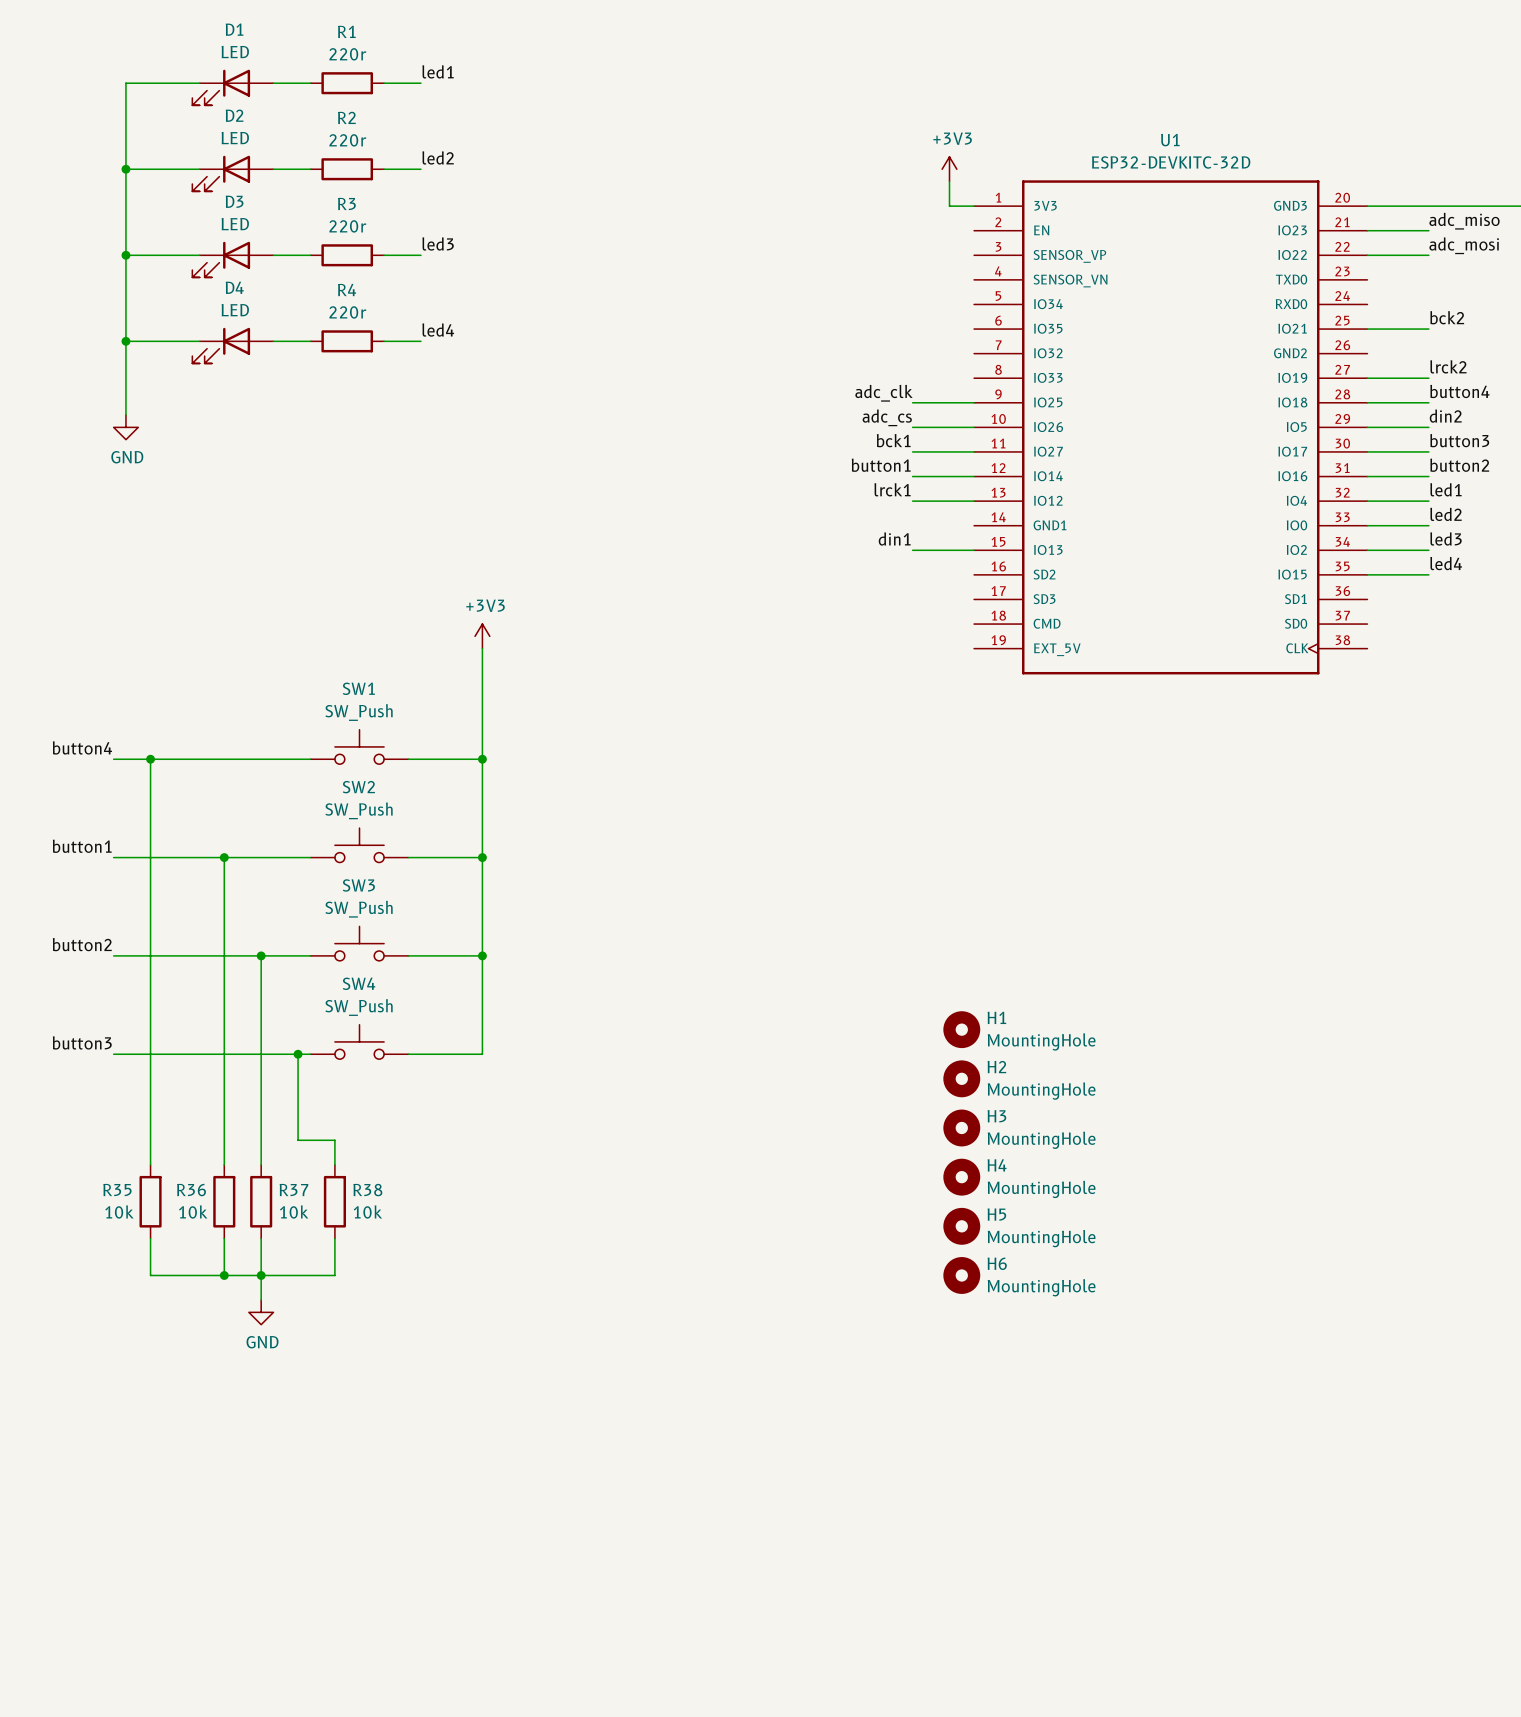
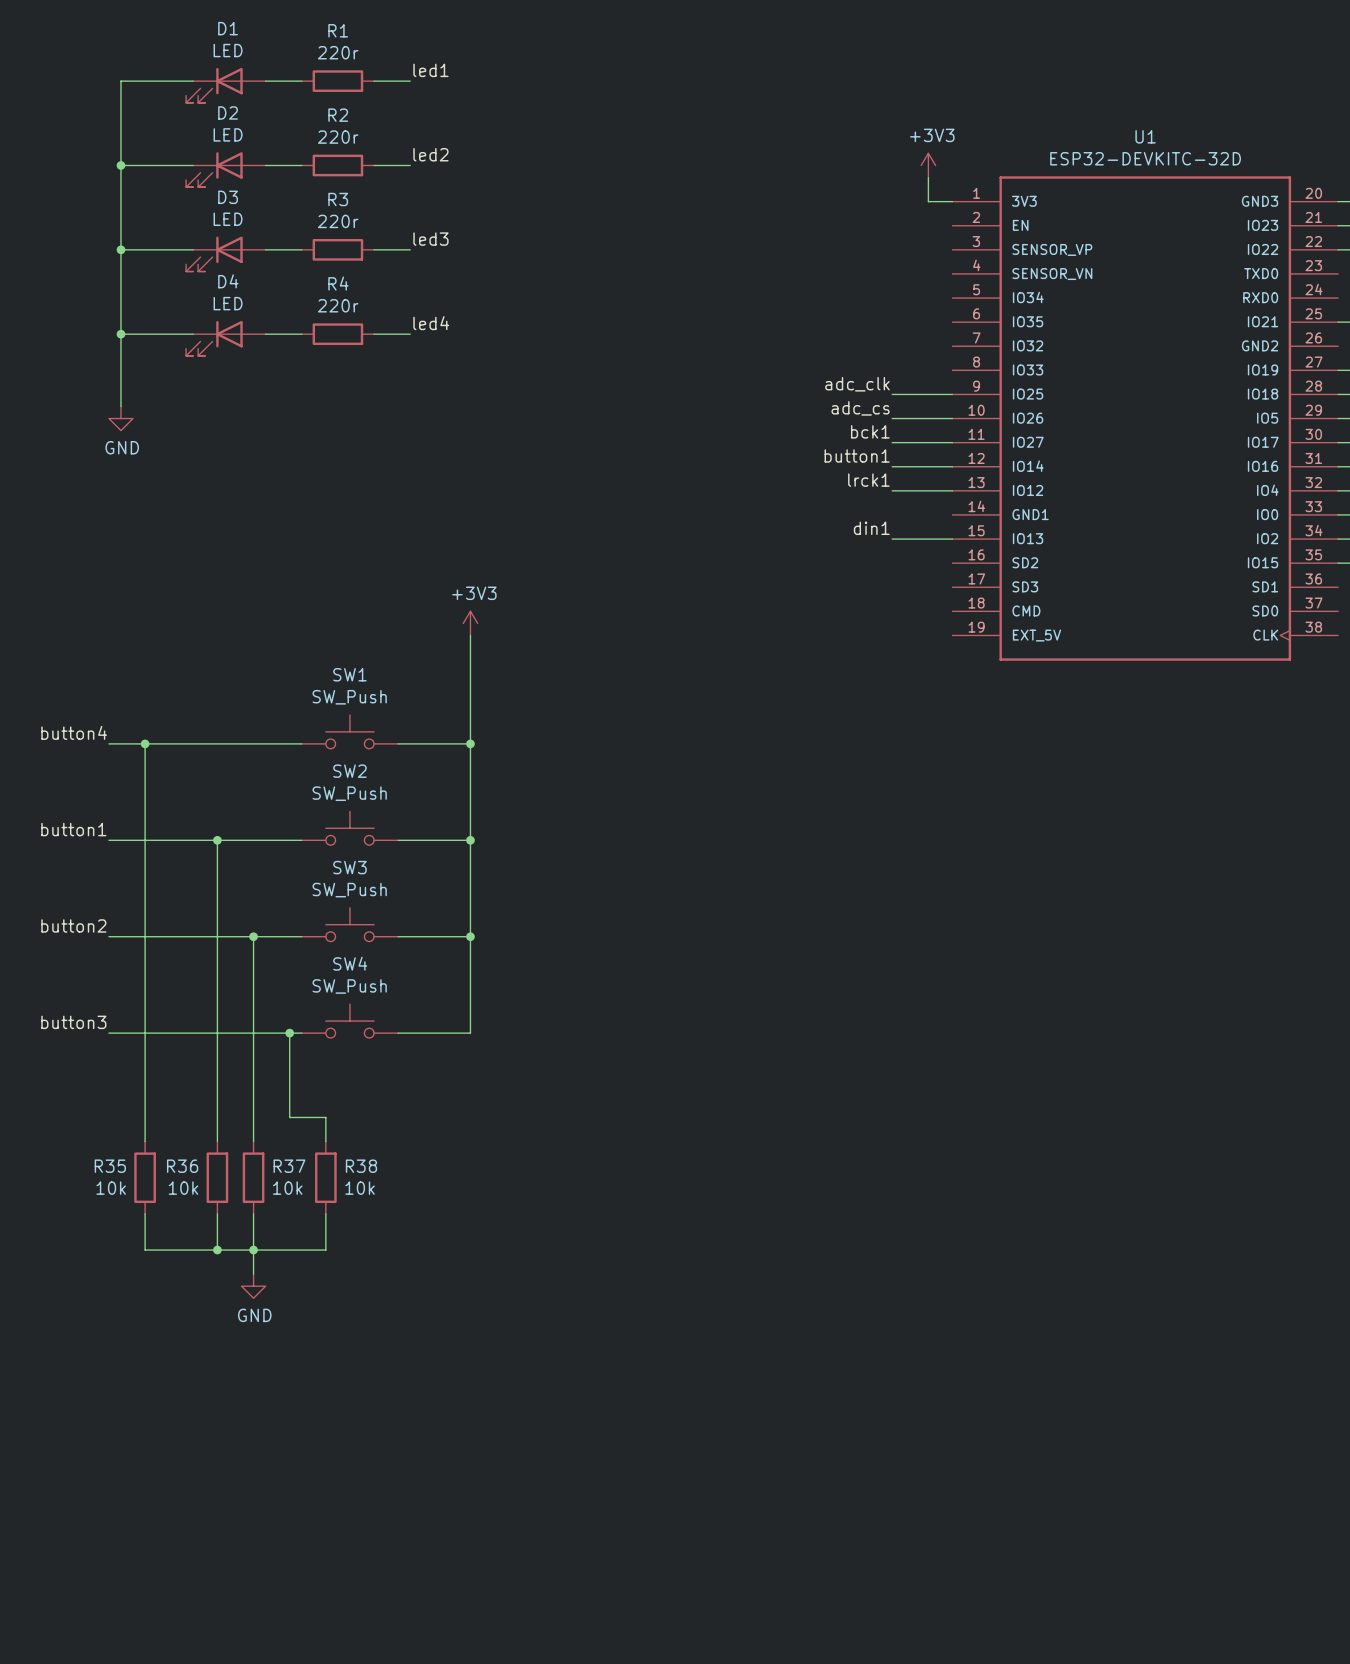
H1: MountingHole (961, 1029) -> none
H2: MountingHole (961, 1078) -> none
H3: MountingHole (961, 1127) -> none
H4: MountingHole (961, 1177) -> none
H5: MountingHole (961, 1226) -> none
H6: MountingHole (961, 1275) -> none

